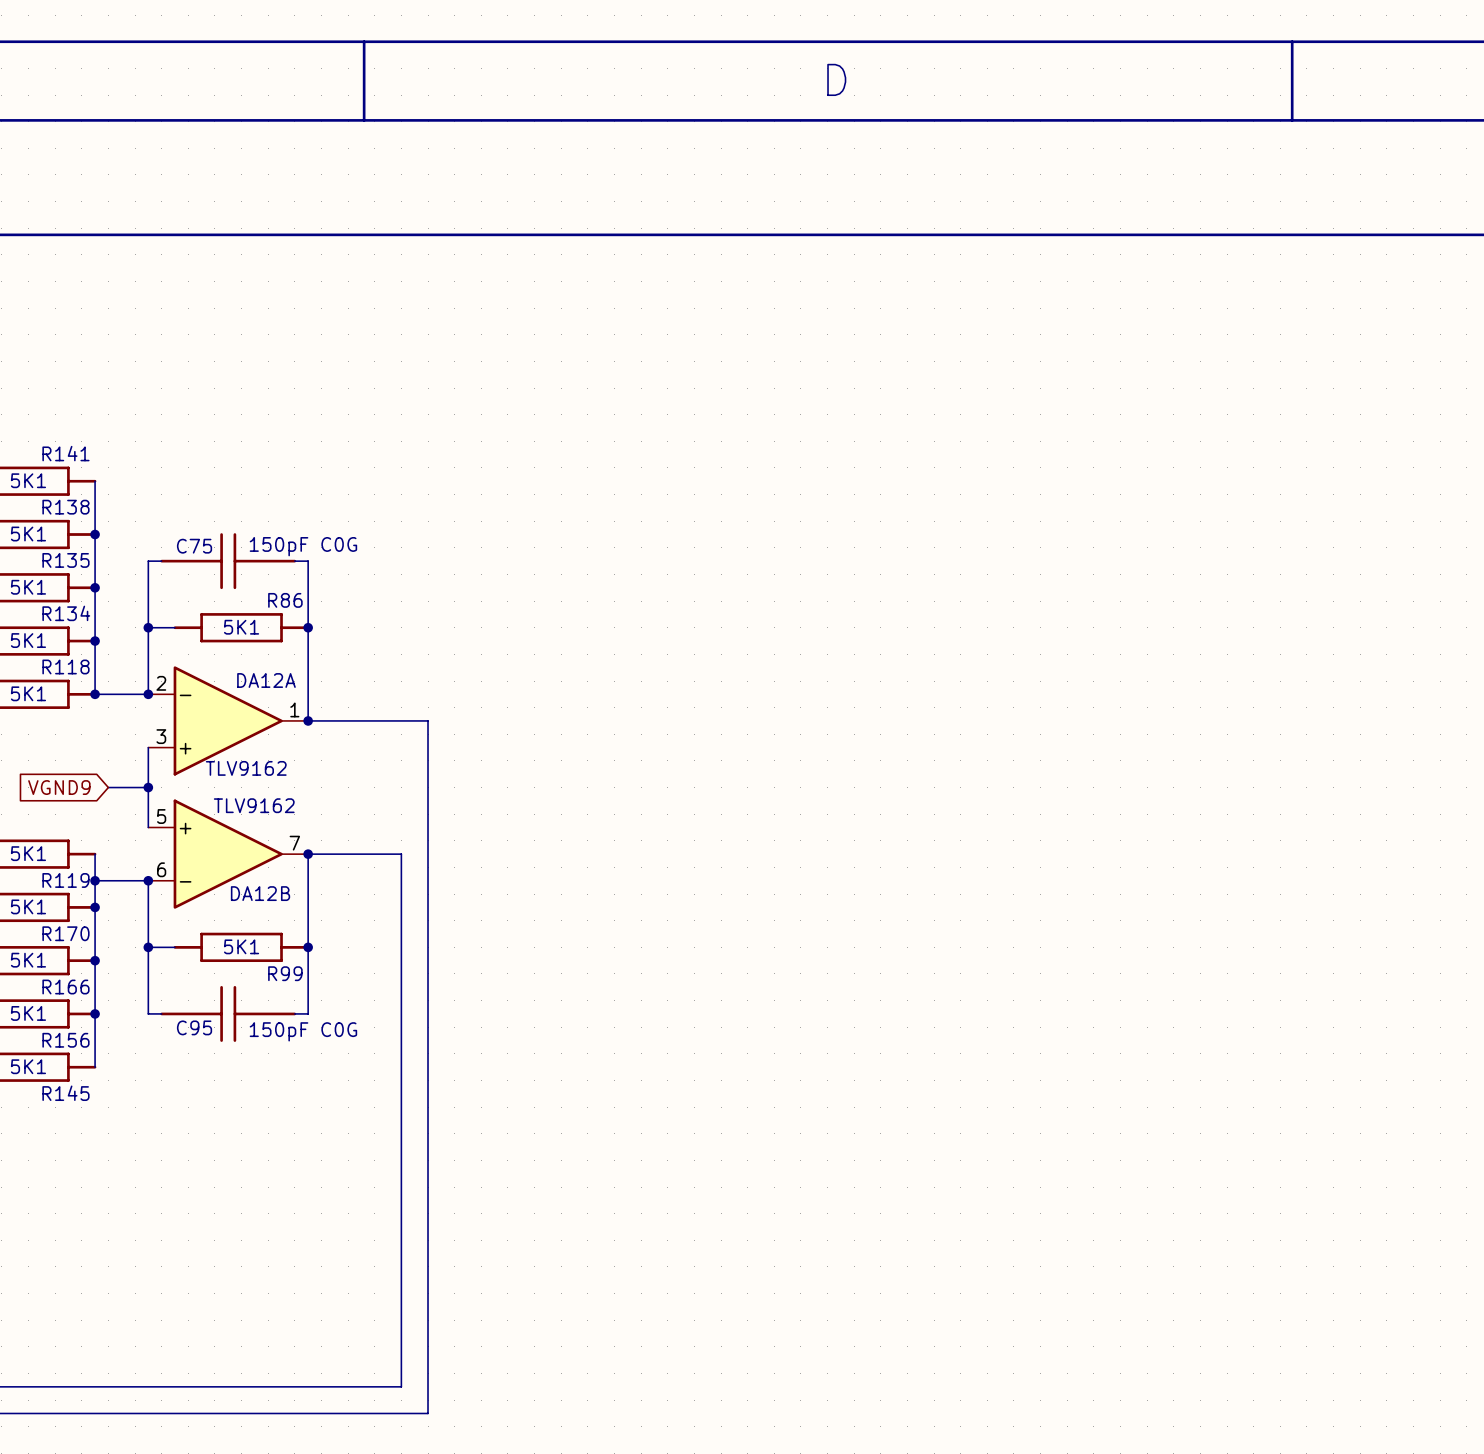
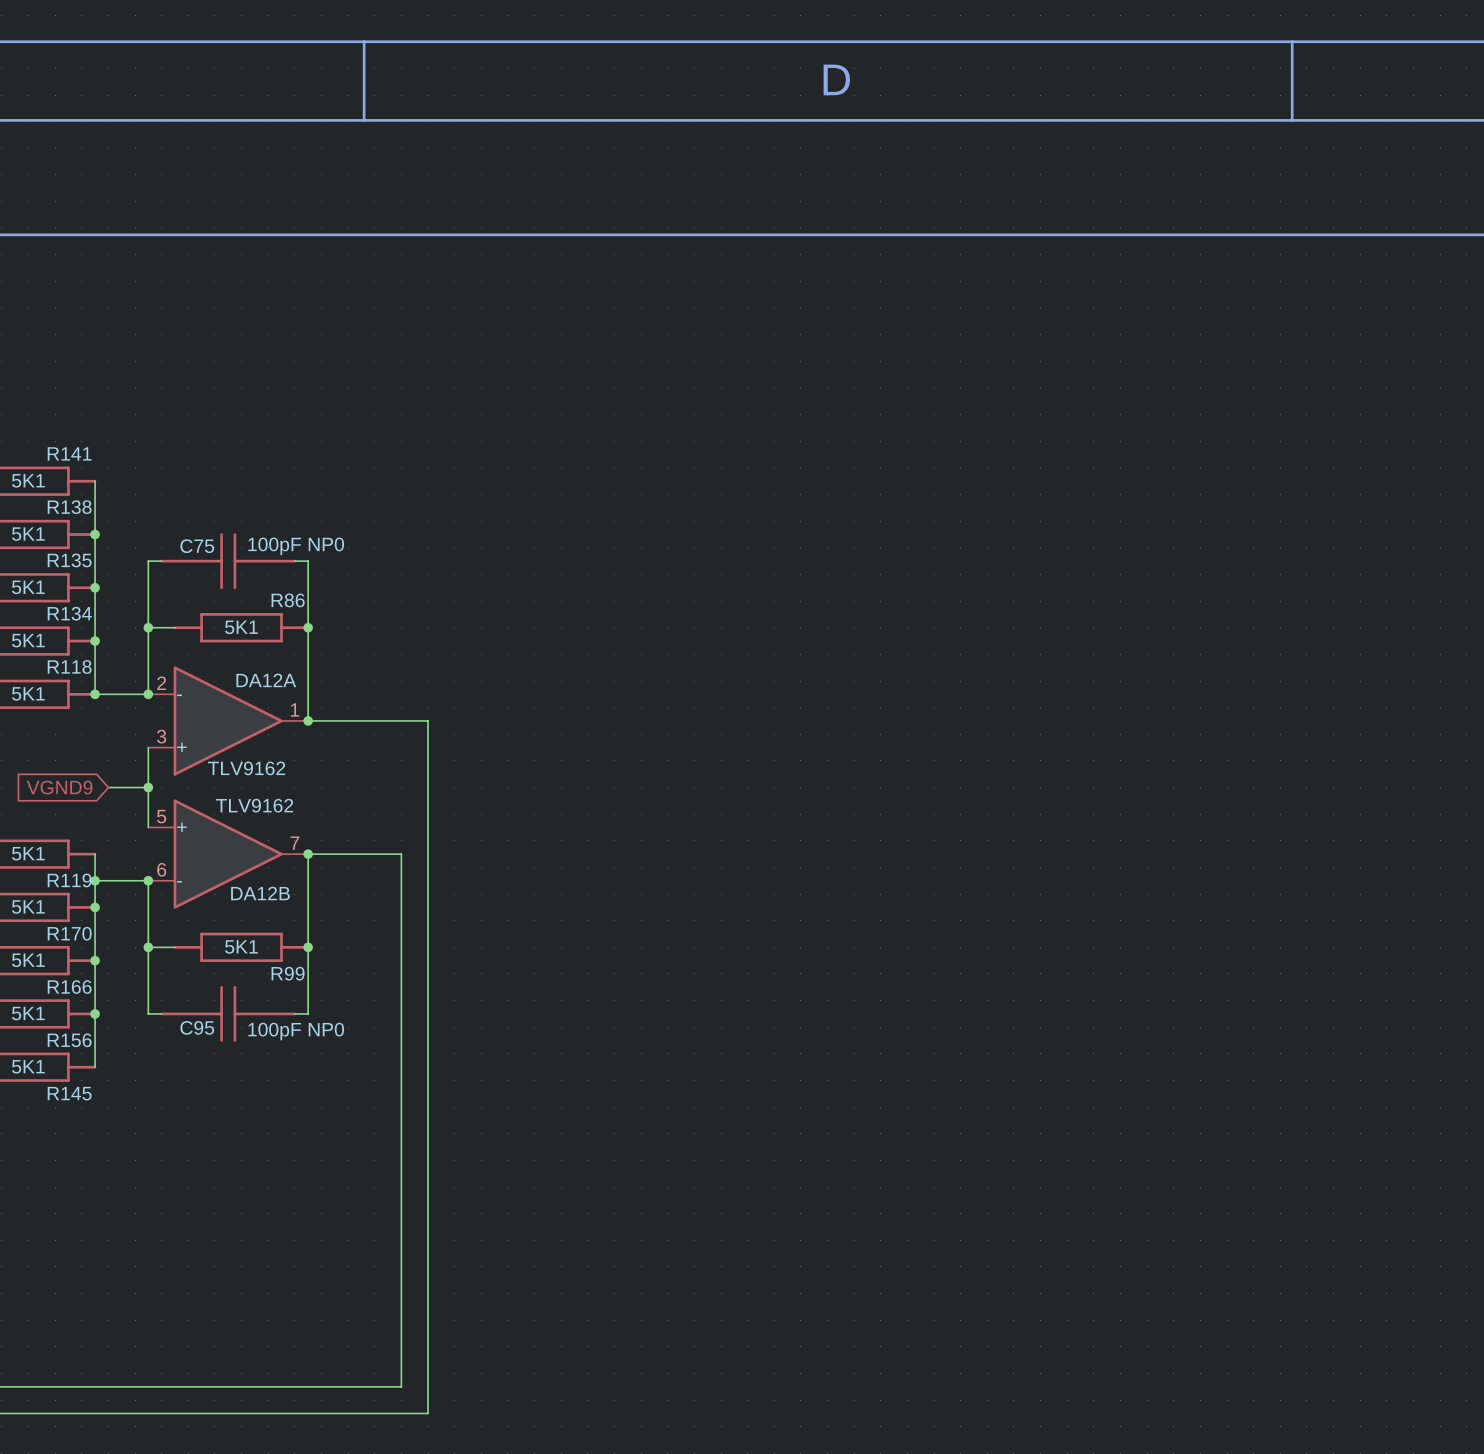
C75 value: 150pF C0G (303, 546) -> 100pF NP0 (296, 546)
C95 value: 150pF C0G (303, 1031) -> 100pF NP0 (296, 1031)

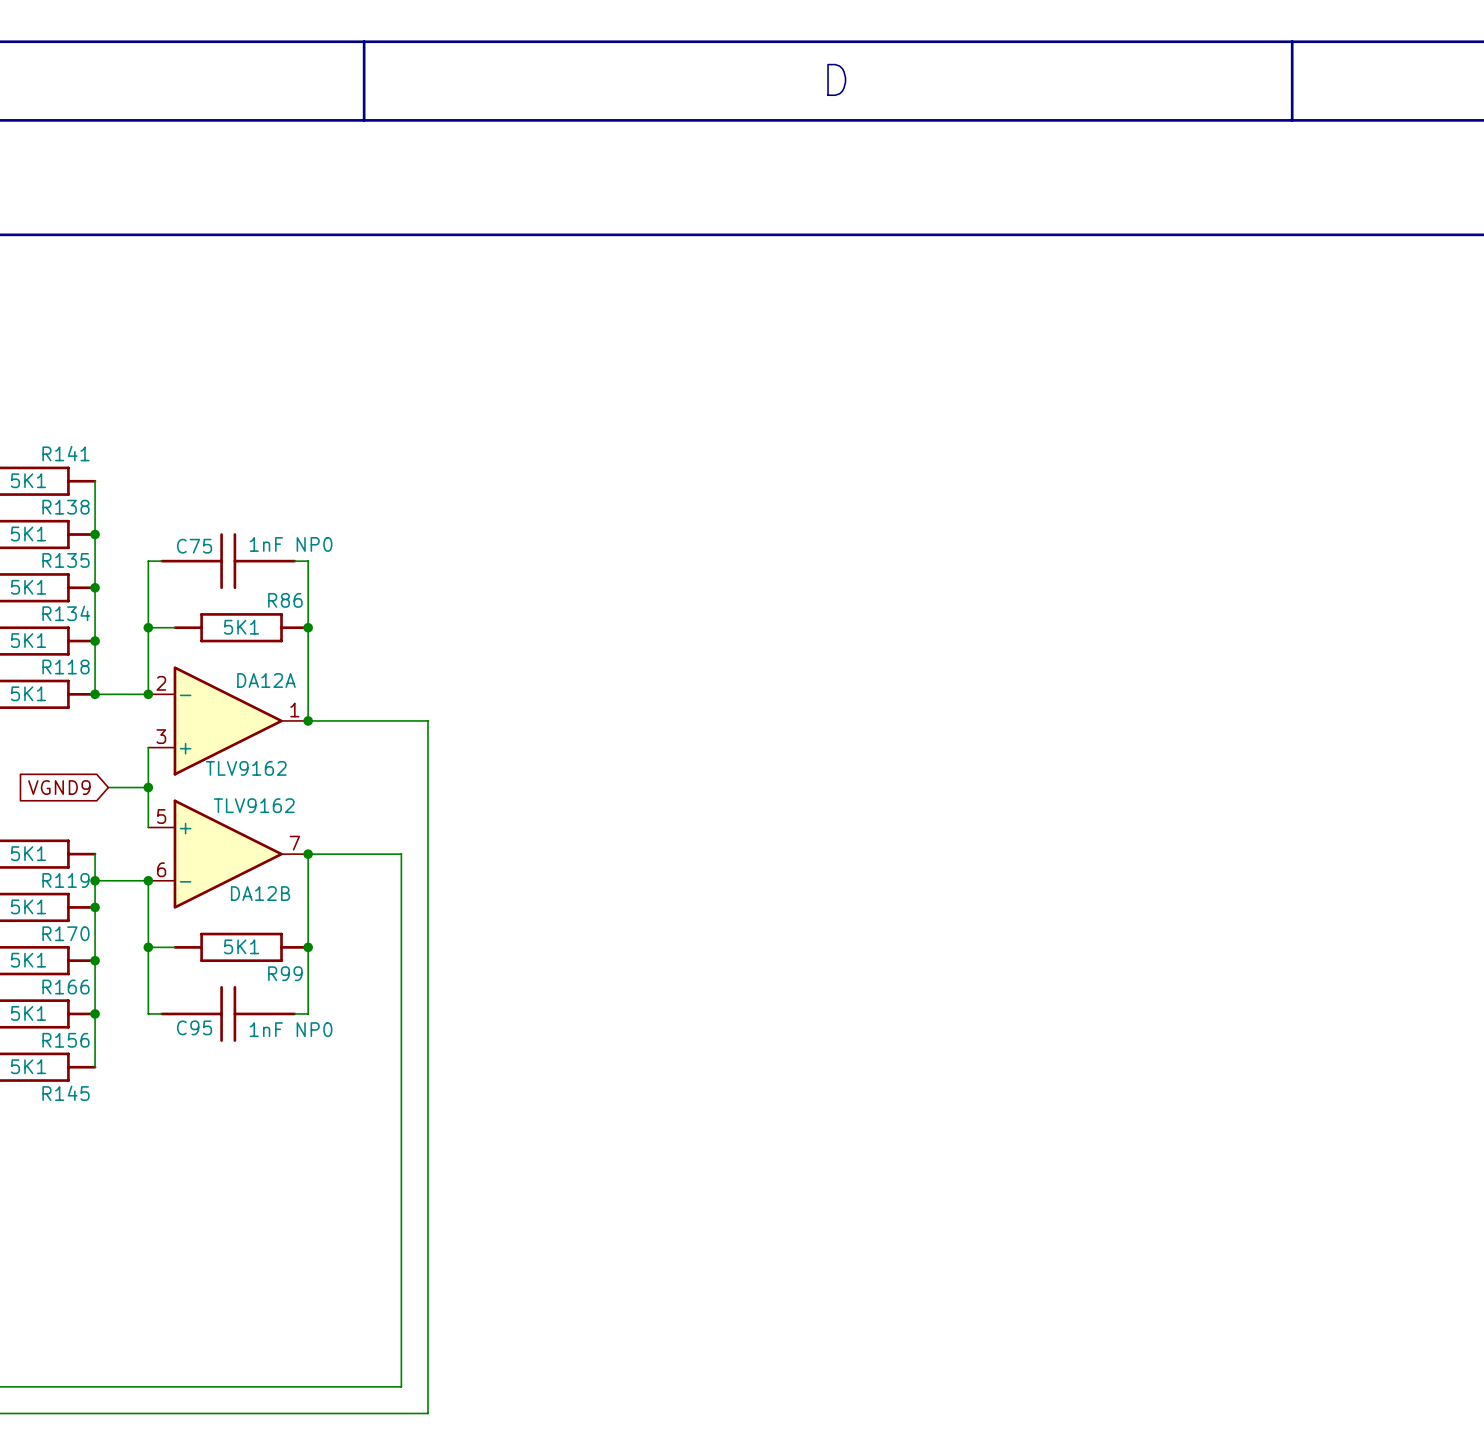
C75 value: 100pF NP0 (296, 546) -> 1nF NP0 (291, 544)
C95 value: 100pF NP0 (296, 1031) -> 1nF NP0 (291, 1029)

